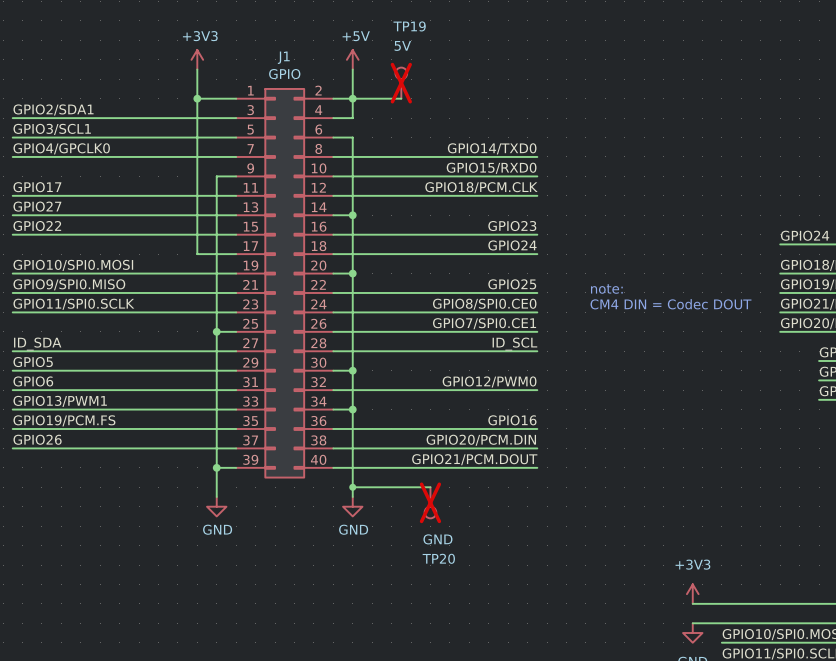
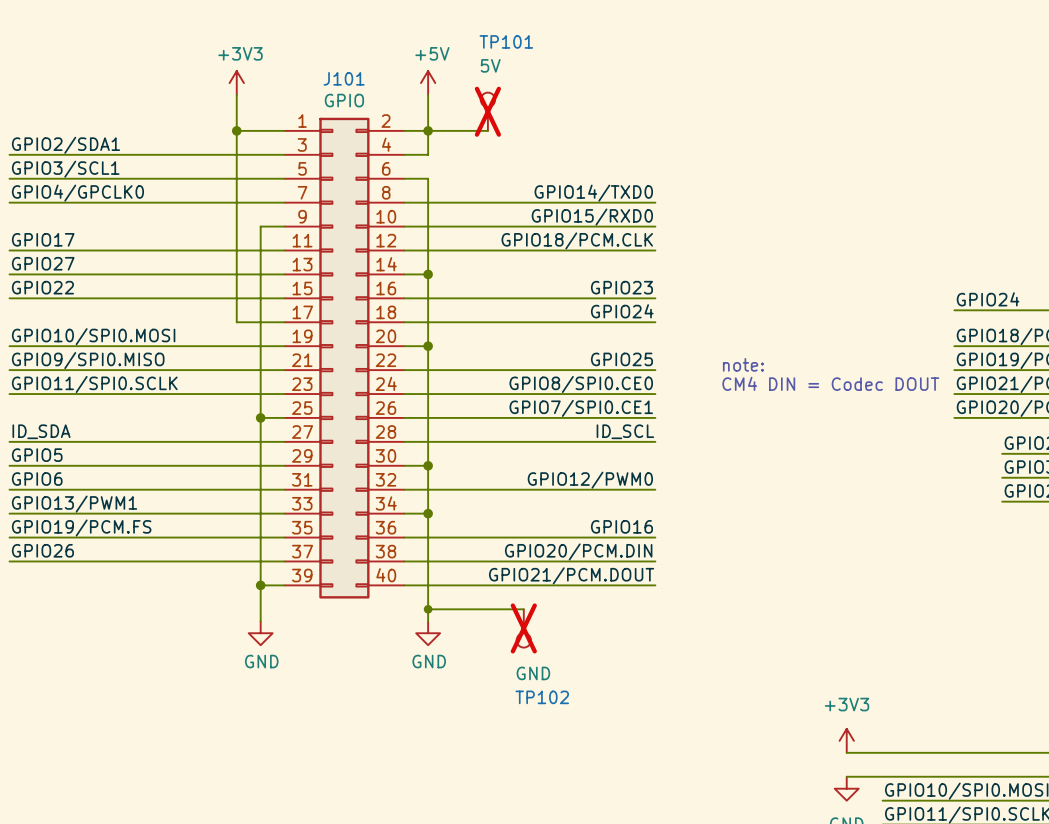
TP19 name: TP19 (409, 26) -> TP101 (506, 41)
J1 name: J1 (283, 57) -> J101 (344, 78)
TP20 name: TP20 (438, 558) -> TP102 (542, 697)

